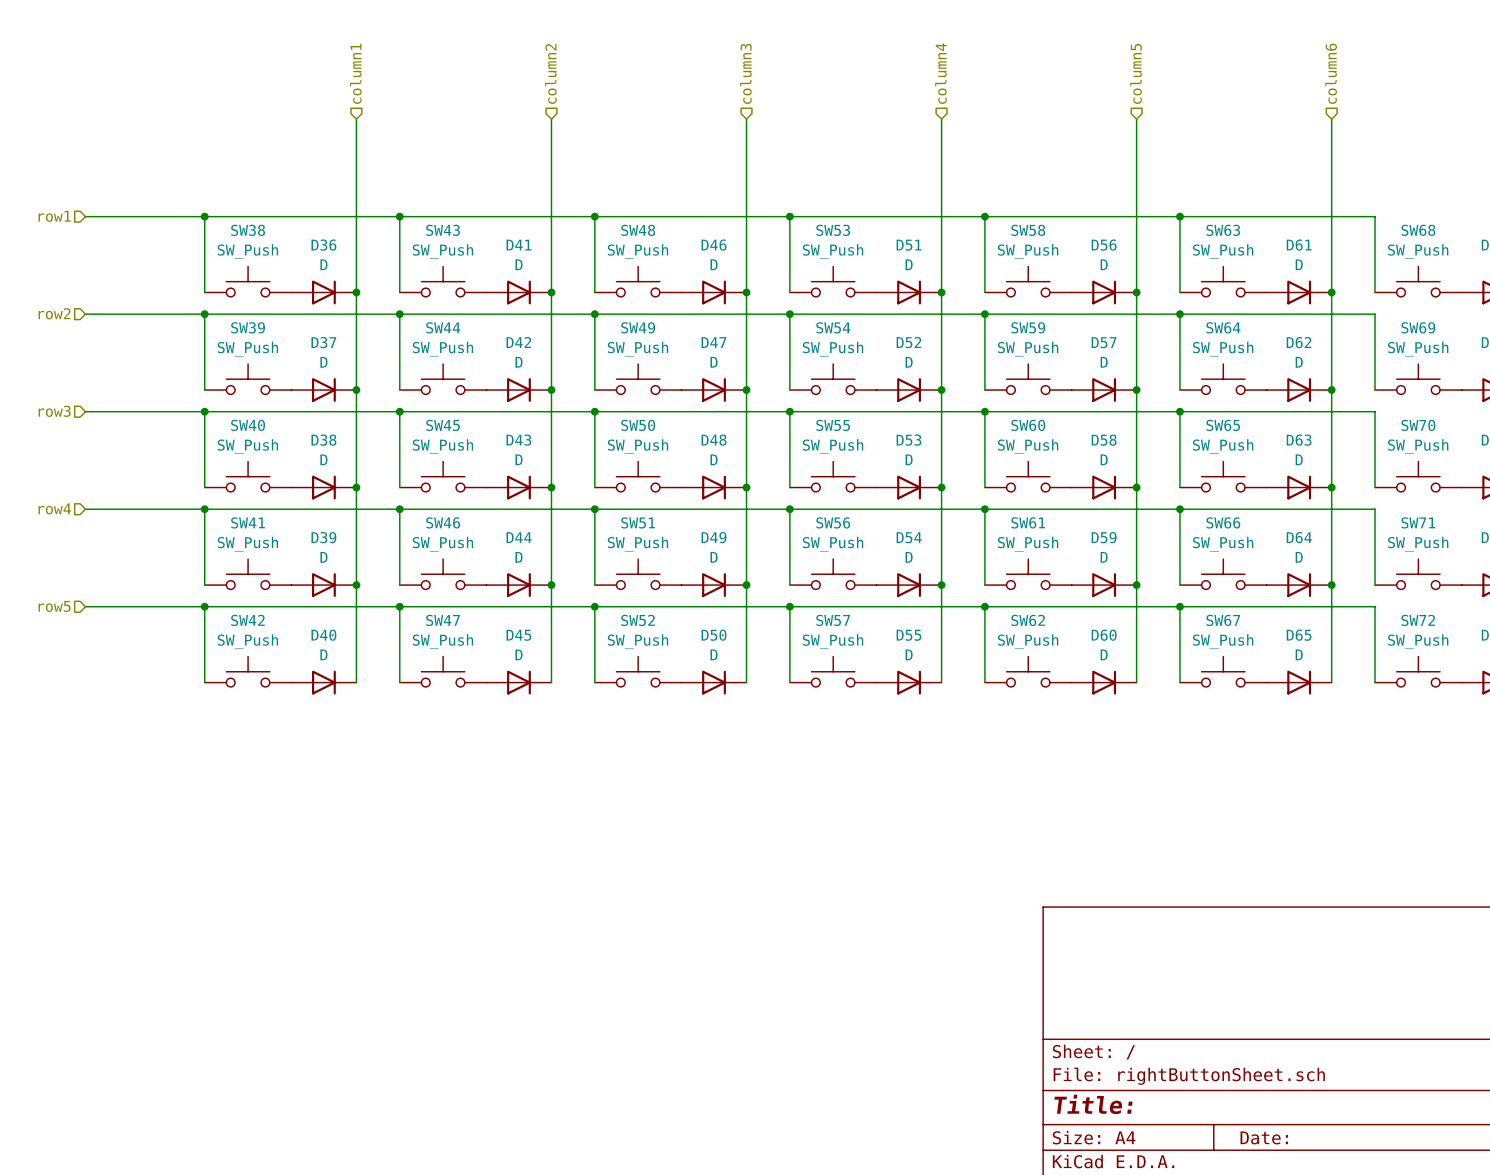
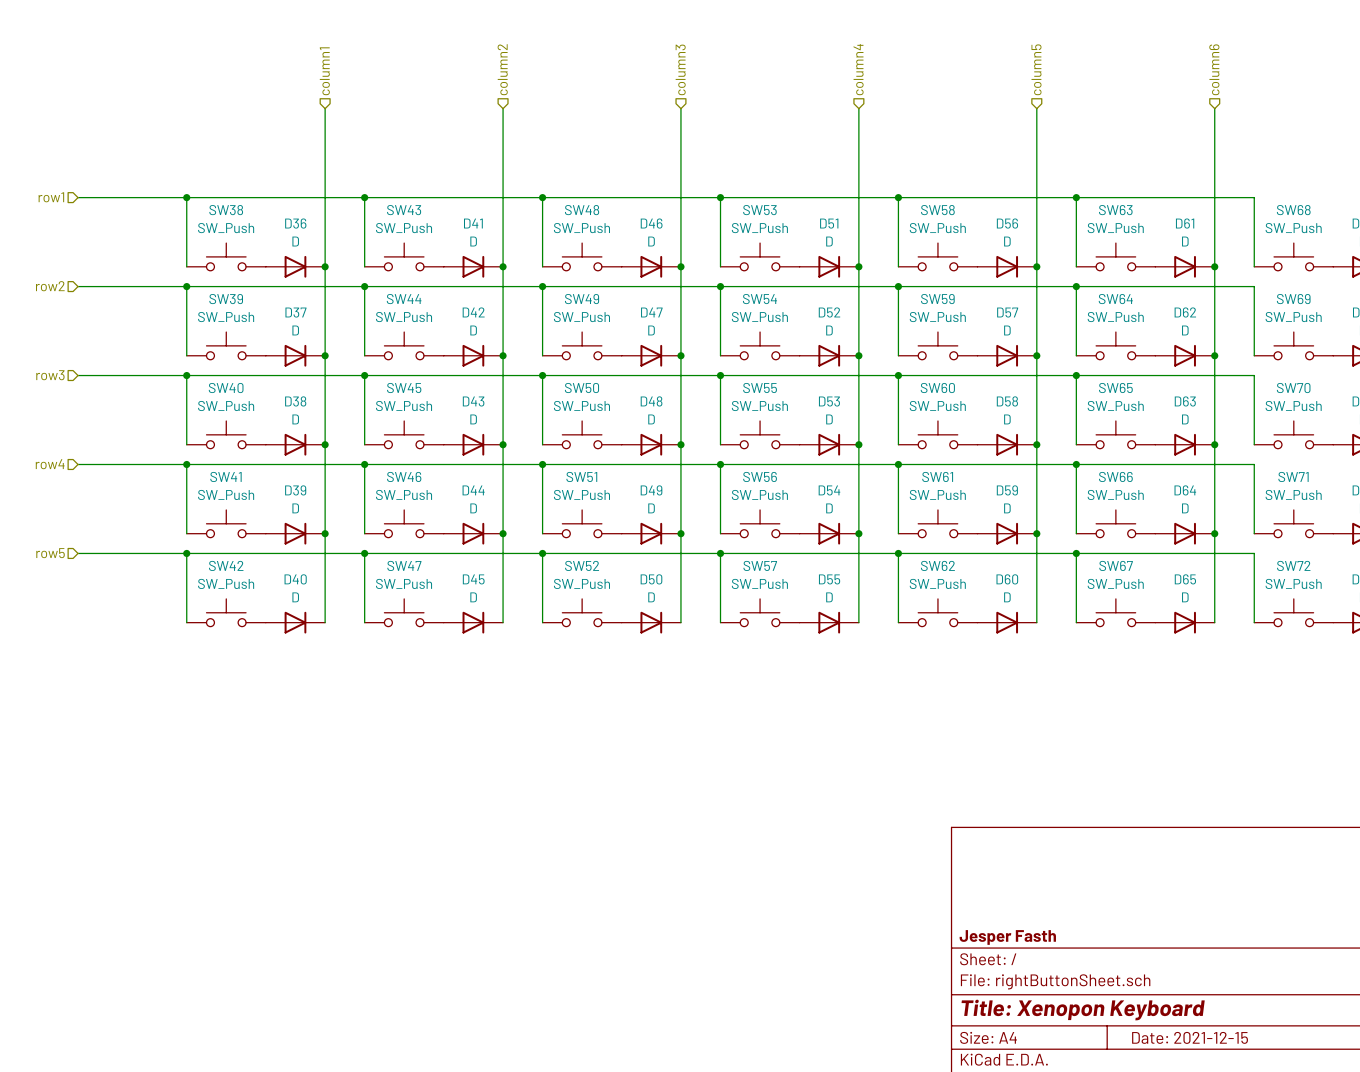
title block: none -> Jesper Fasth (1007, 937)
title block: Title: (1093, 1104) -> Title: Xenopon Keyboard (1083, 1010)
title block: Date: (1264, 1137) -> Date: 2021-12-15 (1190, 1037)

